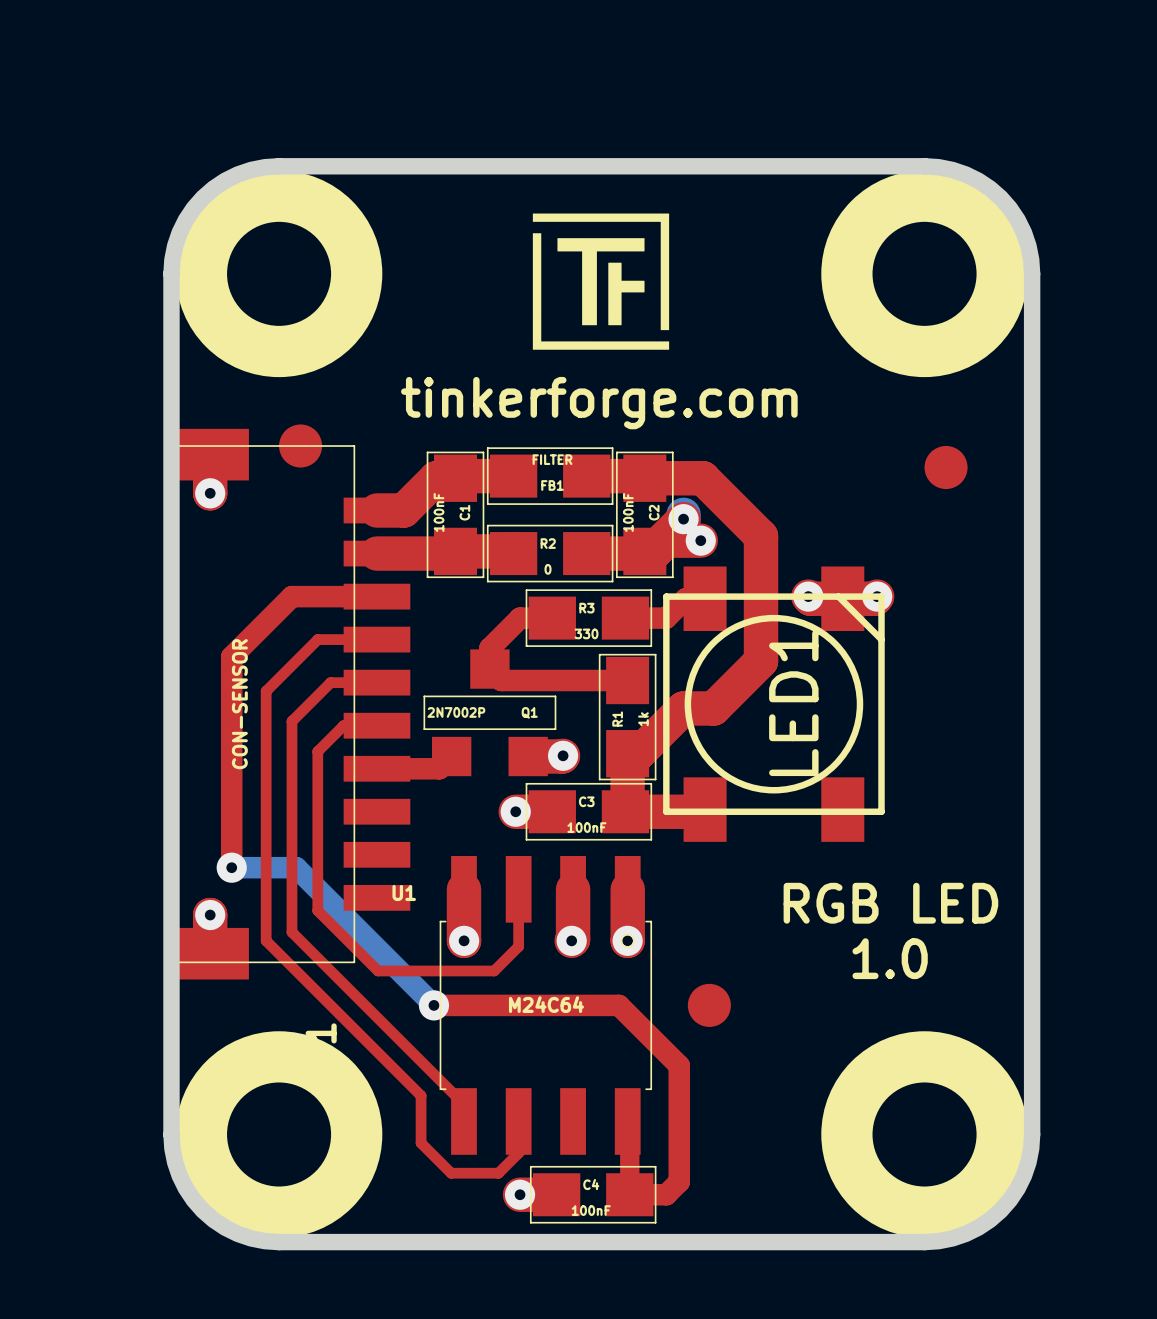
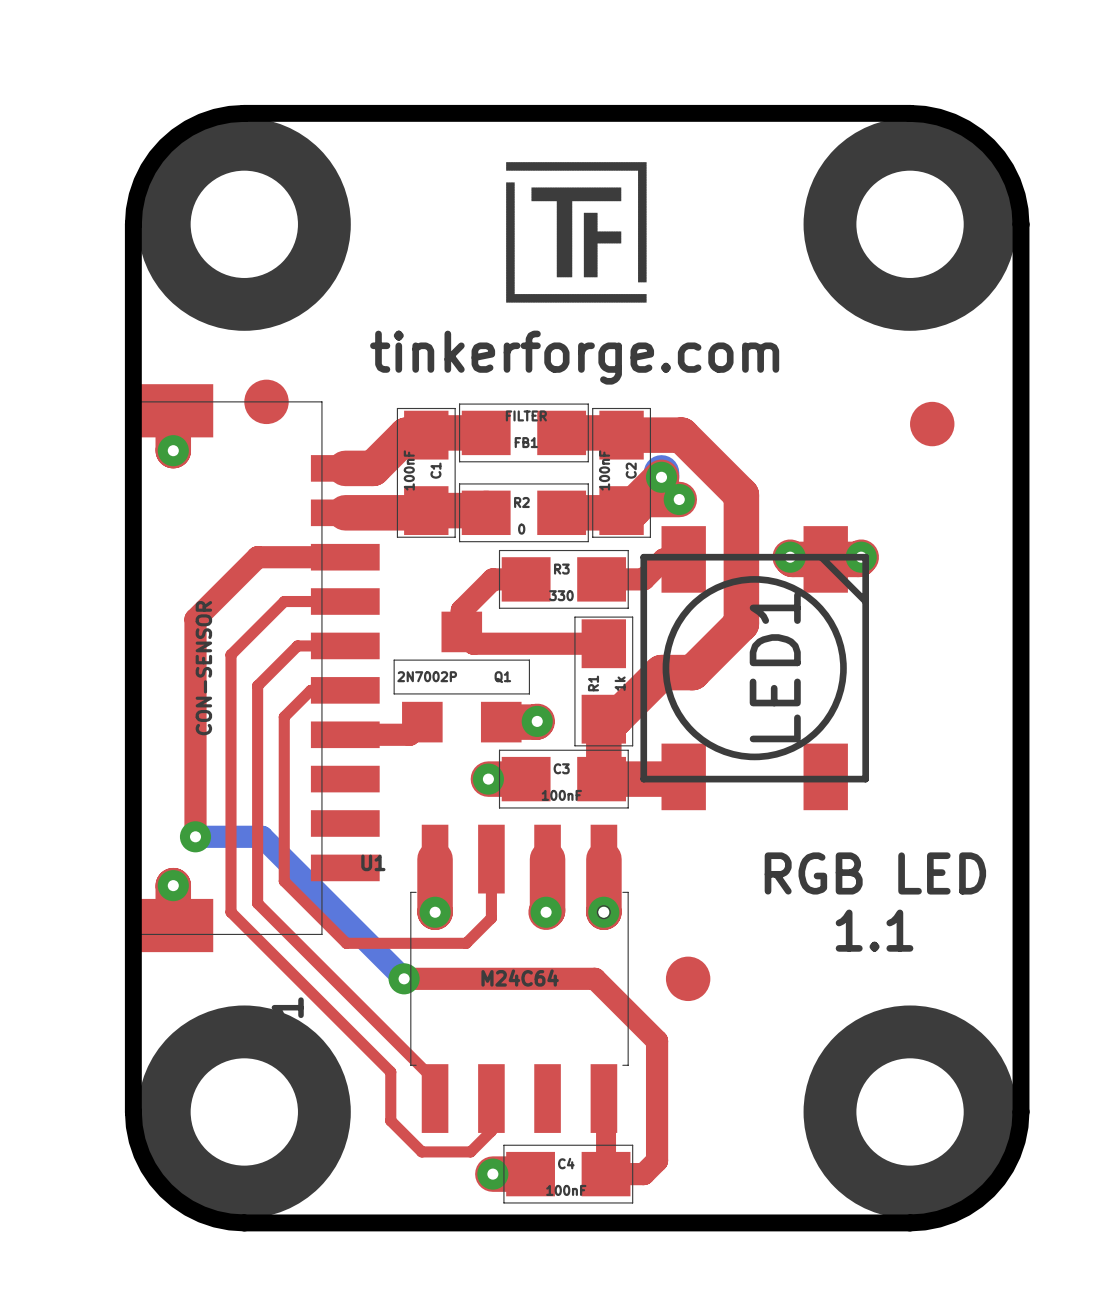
text: 1.0 (890, 958) -> 1.1 (874, 930)

